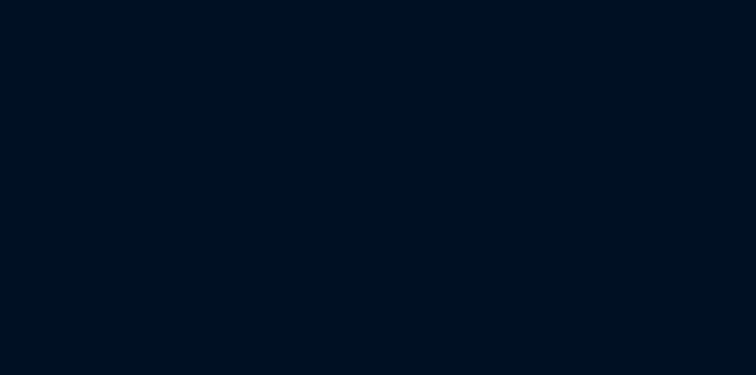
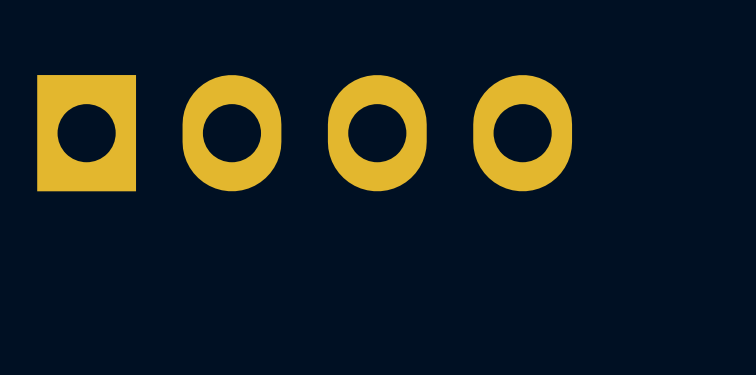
part: none -> (304, 133)

